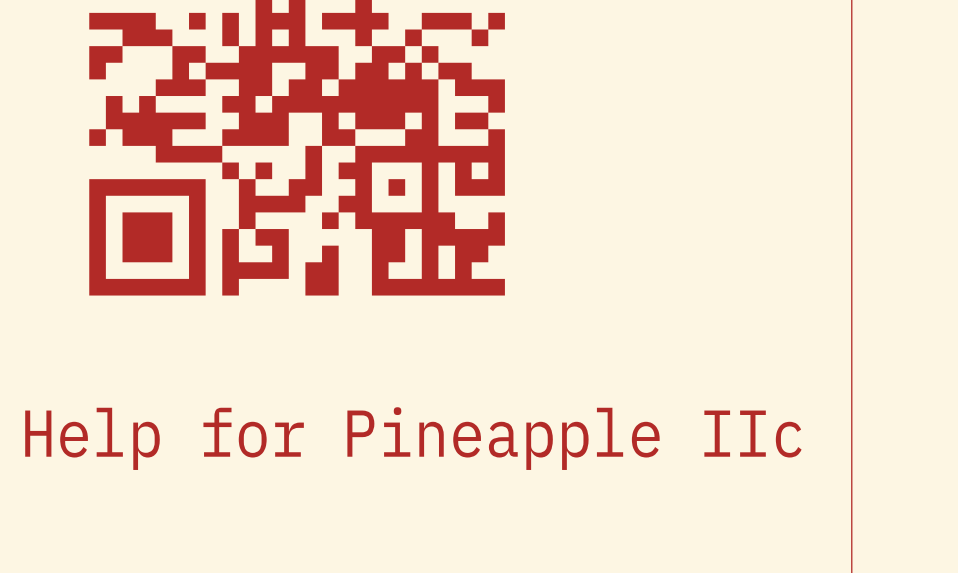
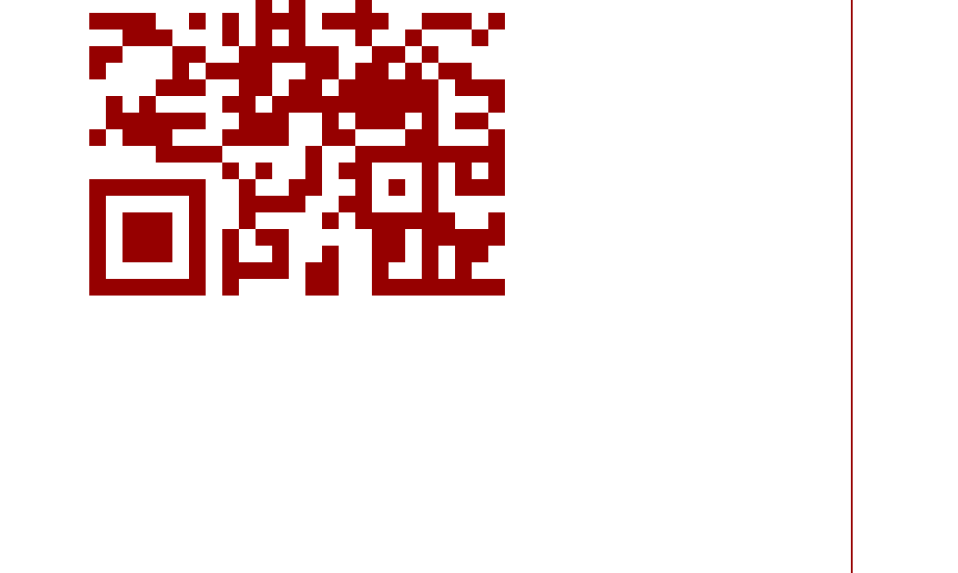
part: (413, 438) -> none

